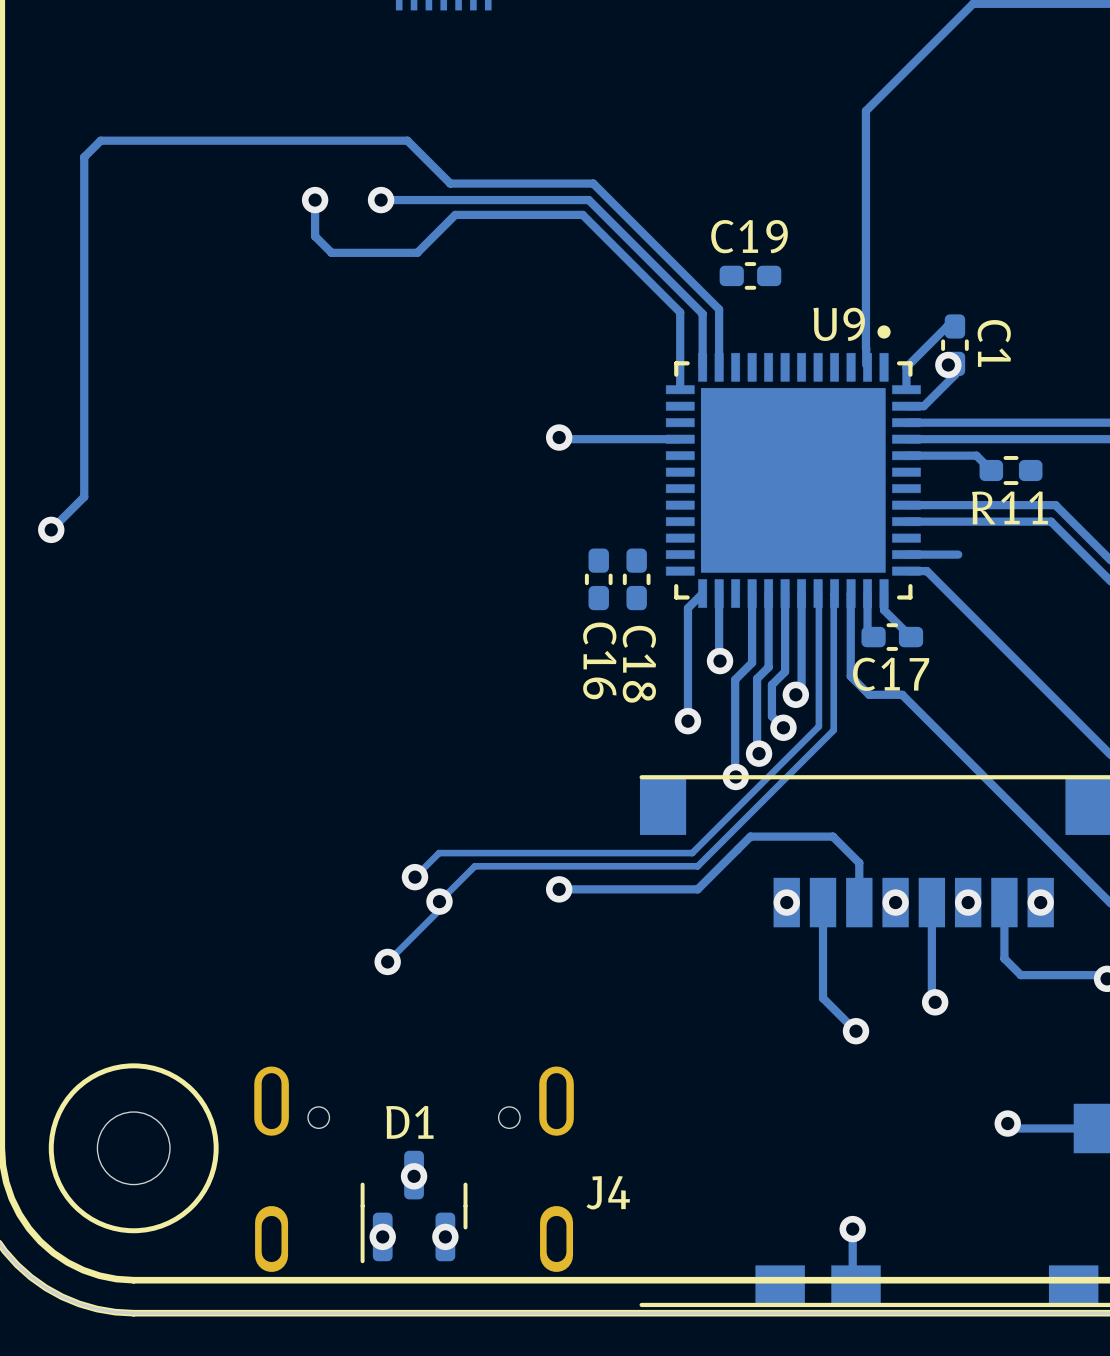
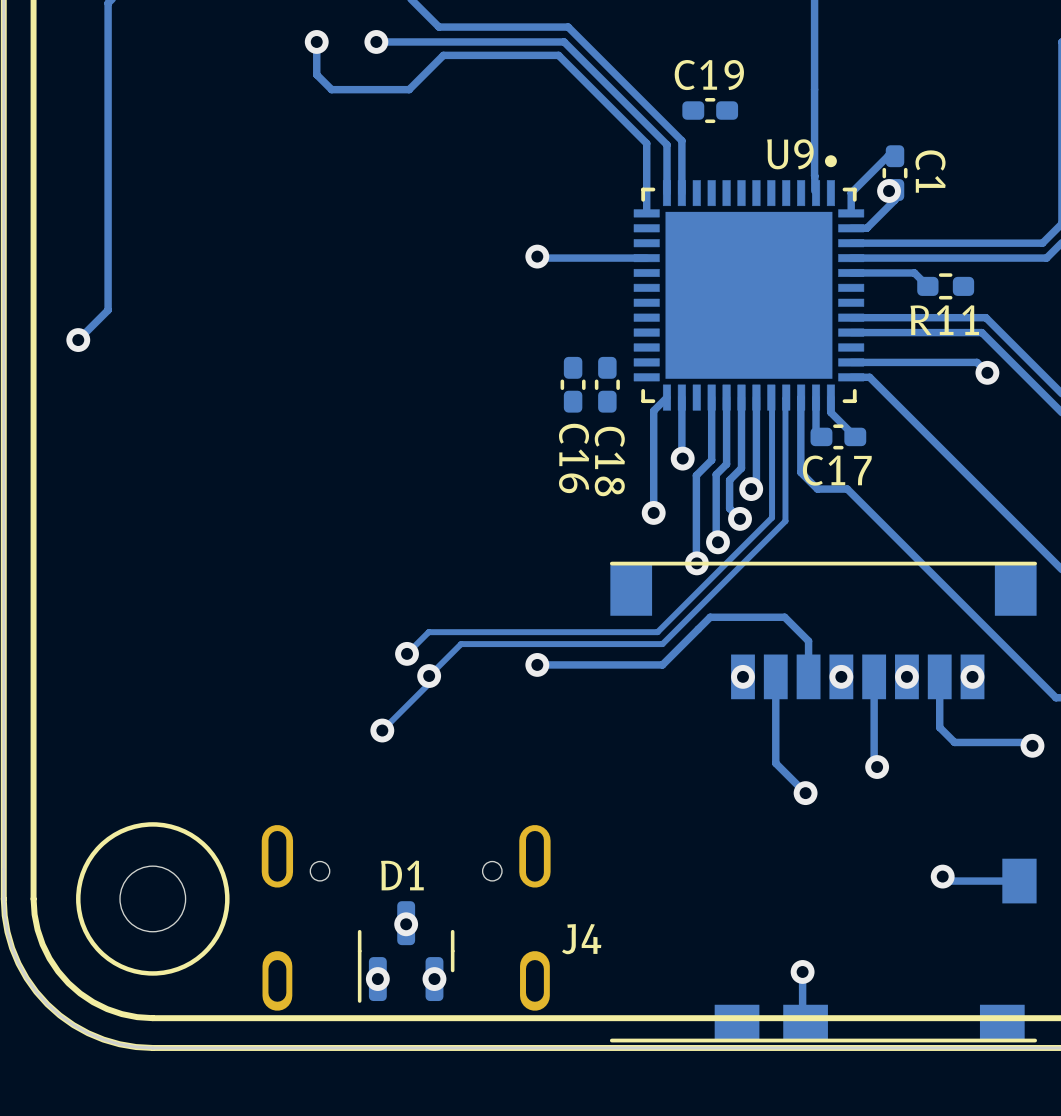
track: none -> (897, 362) (976, 362) (987, 372)
via: none -> (987, 372)

